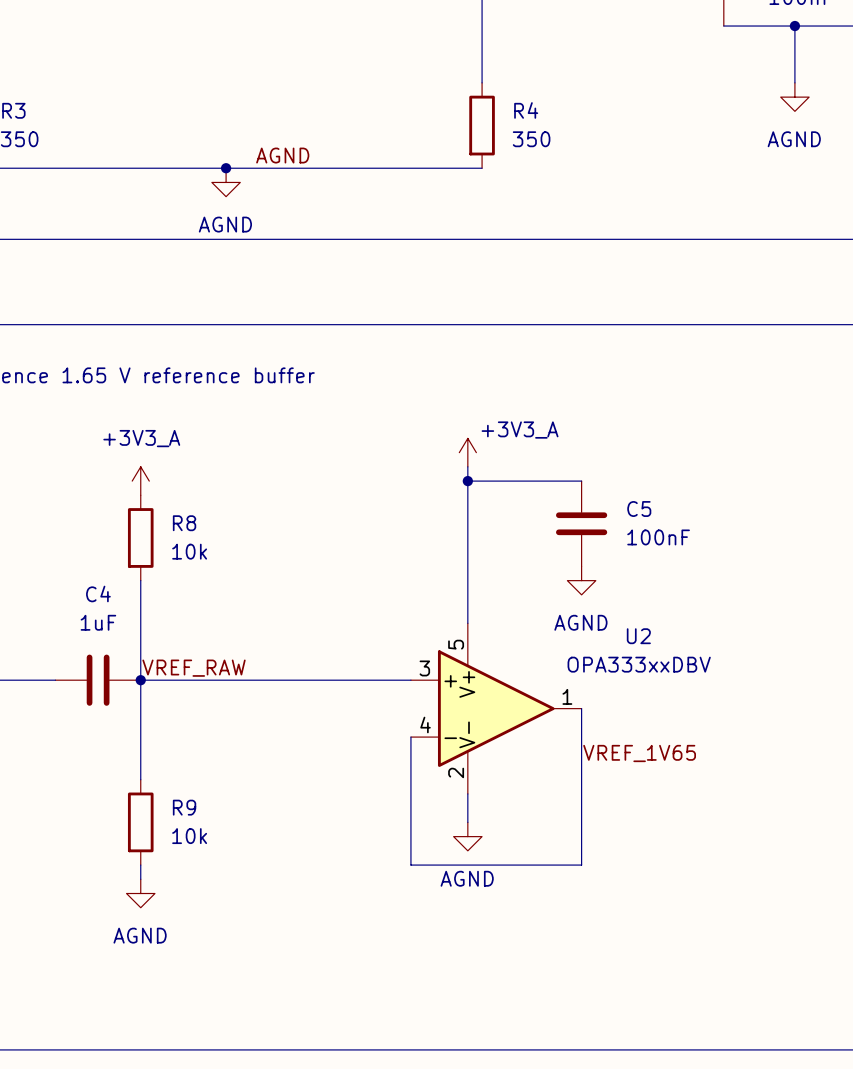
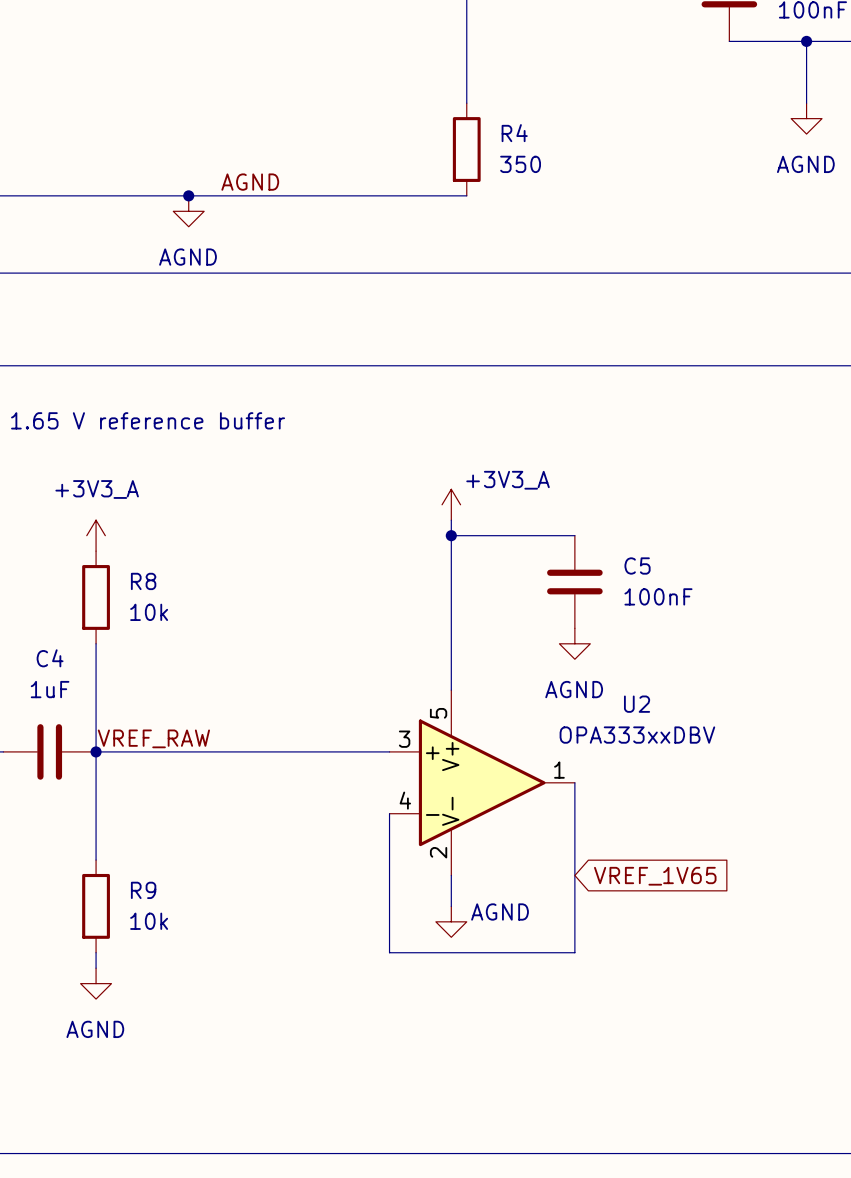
label: VREF_1V65 (639, 753) -> none
global label: none -> VREF_1V65 (655, 876)
power symbol text position: AGND (467, 878) -> AGND (500, 912)

